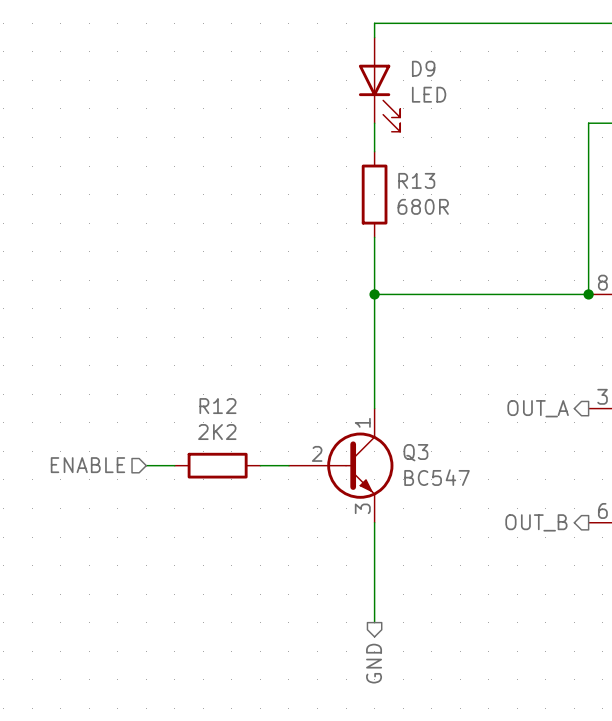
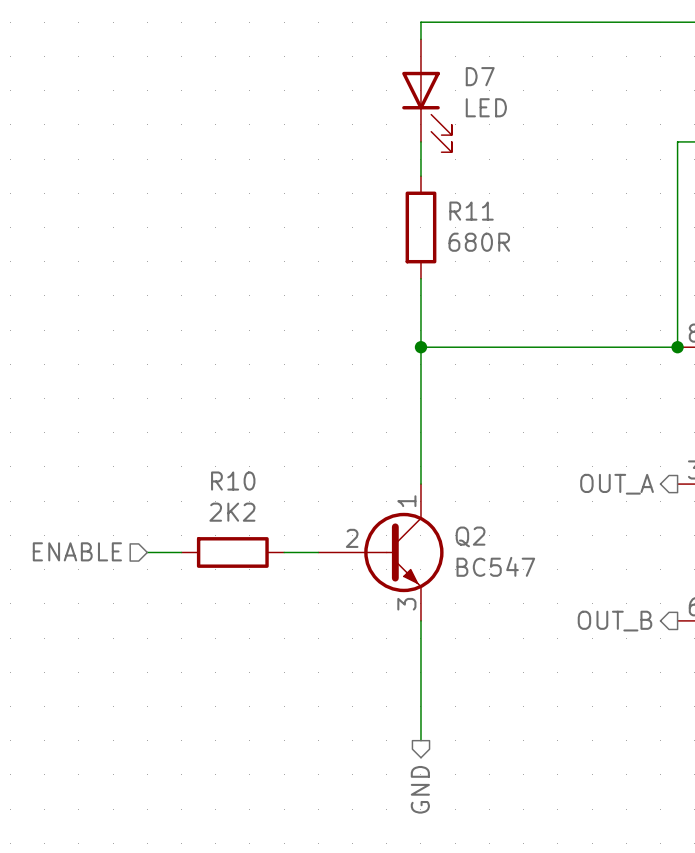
D9 name: D9 (423, 68) -> D7 (480, 76)
R13 name: R13 (416, 180) -> R11 (471, 211)
R12 name: R12 (217, 406) -> R10 (233, 481)
Q3 name: Q3 (415, 452) -> Q2 (470, 536)

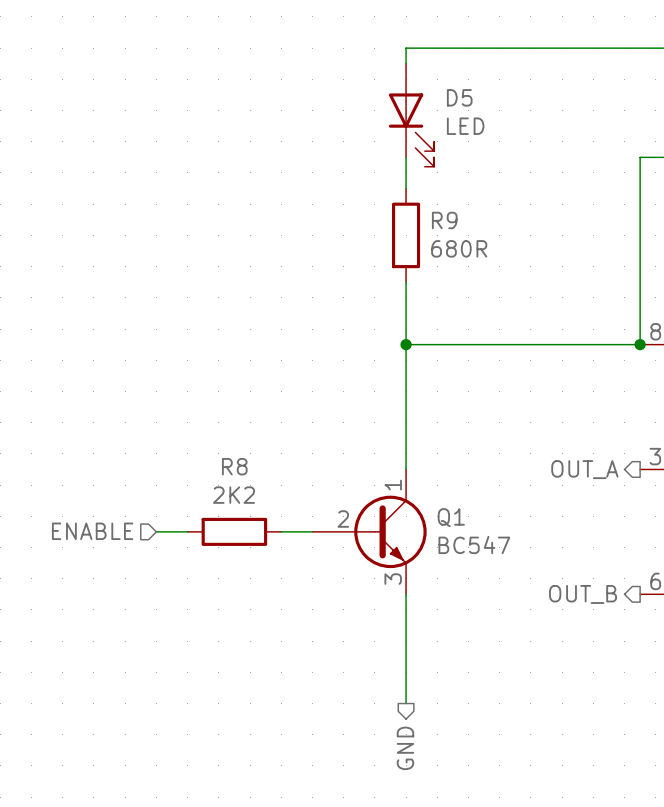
D7 name: D7 (480, 76) -> D5 (459, 97)
R11 name: R11 (471, 211) -> R9 (444, 220)
R10 name: R10 (233, 481) -> R8 (234, 466)
Q2 name: Q2 (470, 536) -> Q1 (451, 517)

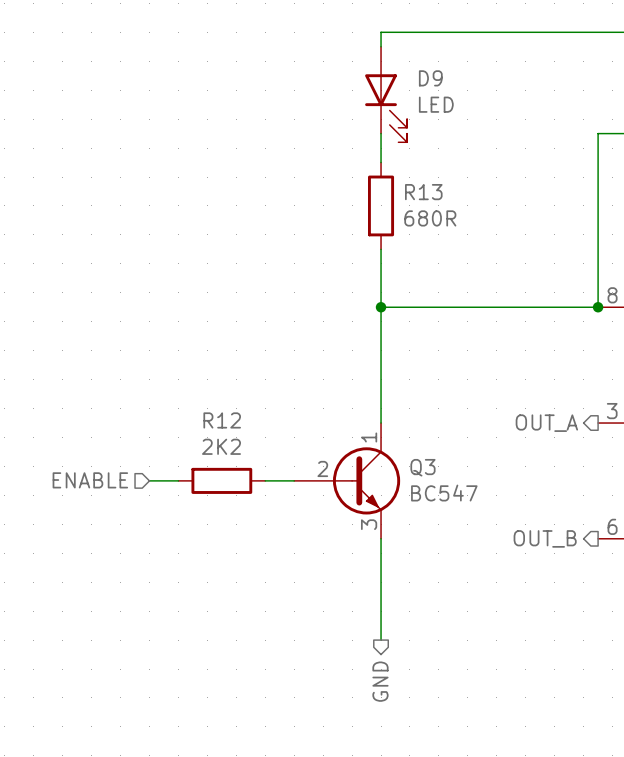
D5 name: D5 (459, 97) -> D9 (430, 78)
R9 name: R9 (444, 220) -> R13 (423, 192)
R8 name: R8 (234, 466) -> R12 (222, 420)
Q1 name: Q1 (451, 517) -> Q3 (422, 467)

